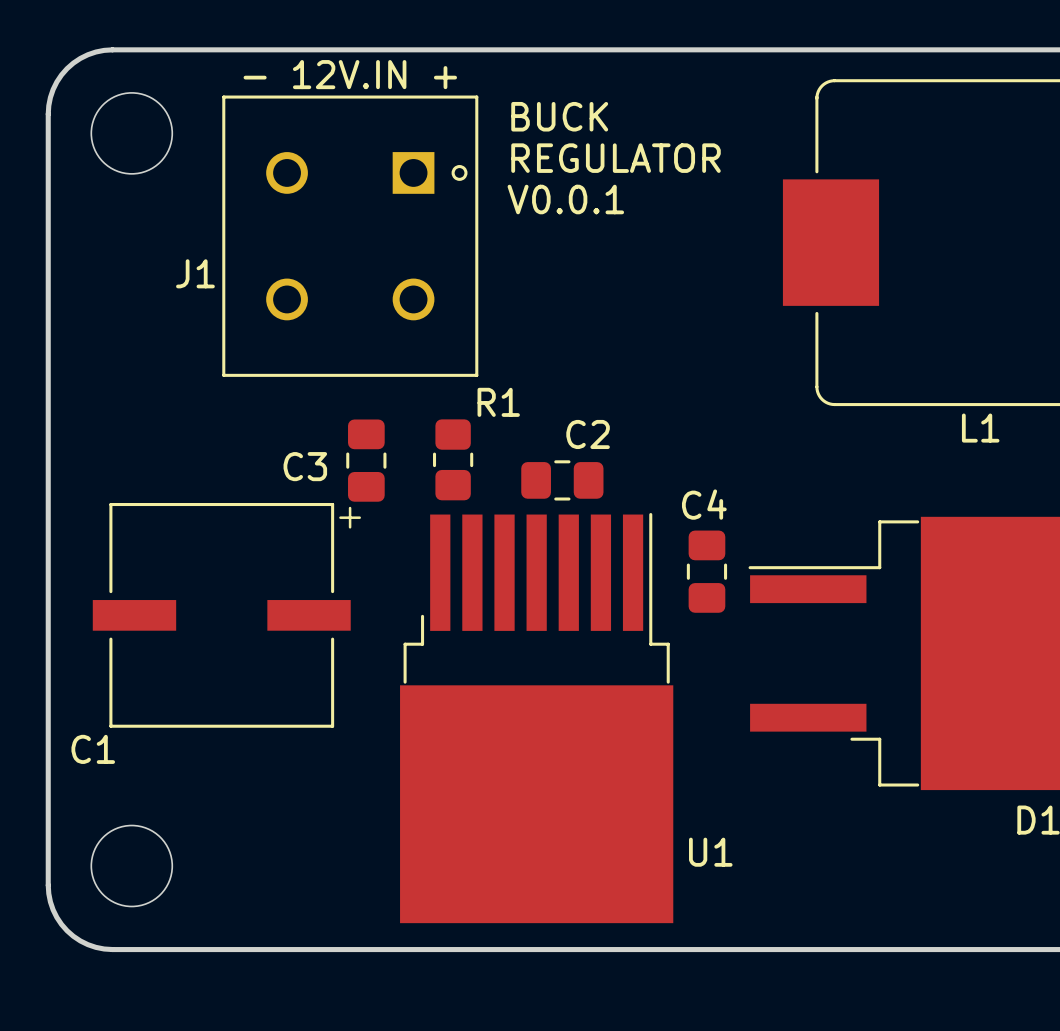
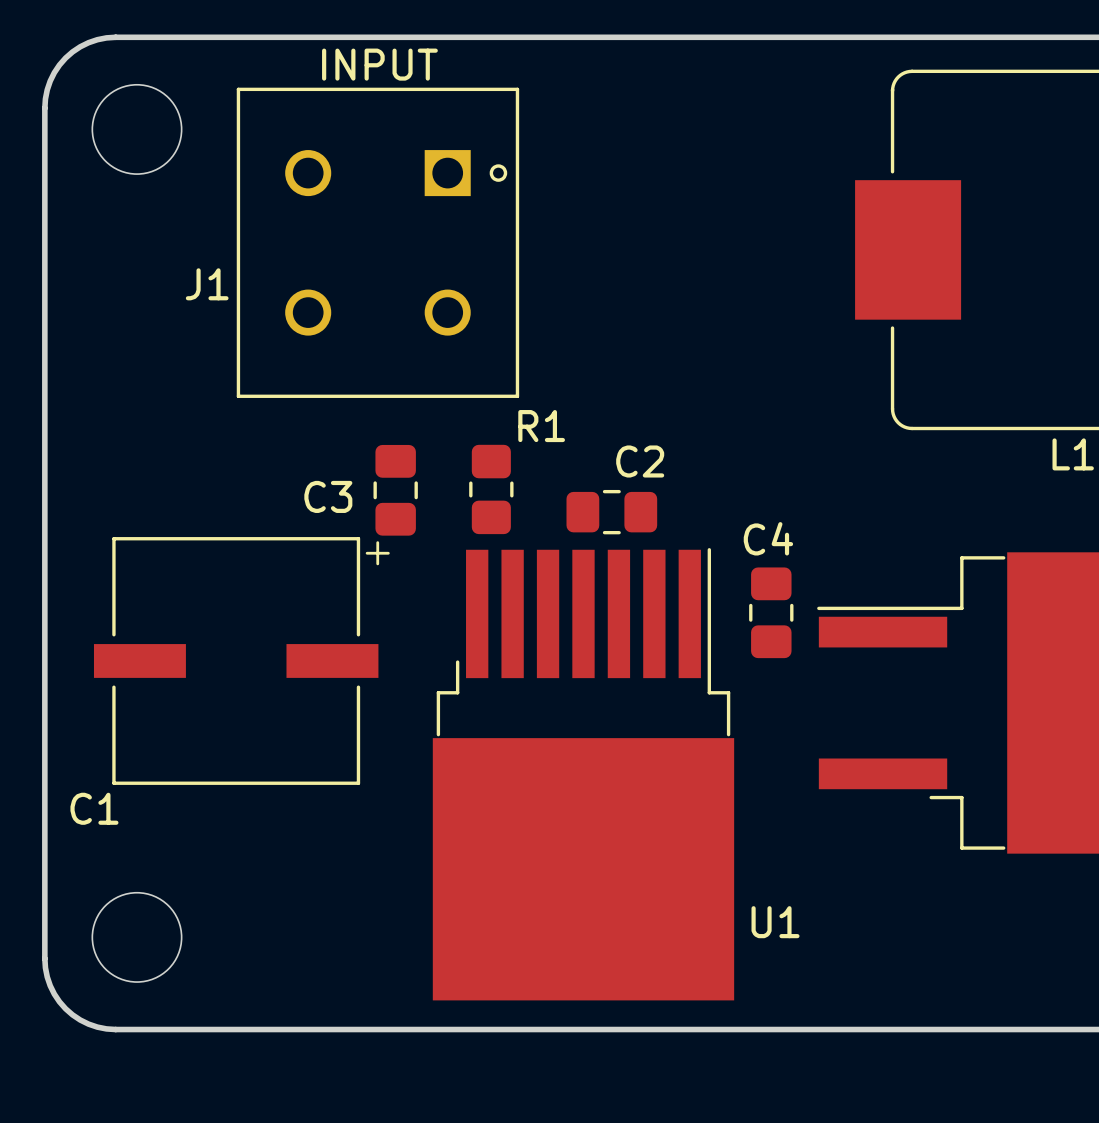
J1 value: - 12V.IN + (350, 74) -> INPUT (379, 64)
text: BUCK (559, 116) -> none
text: REGULATOR (616, 158) -> none
text: V0.0.1 (565, 199) -> none

